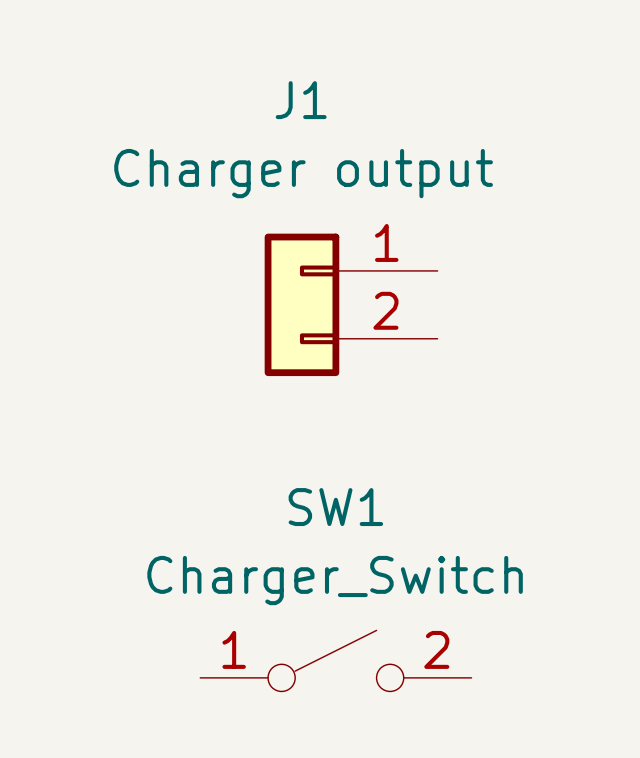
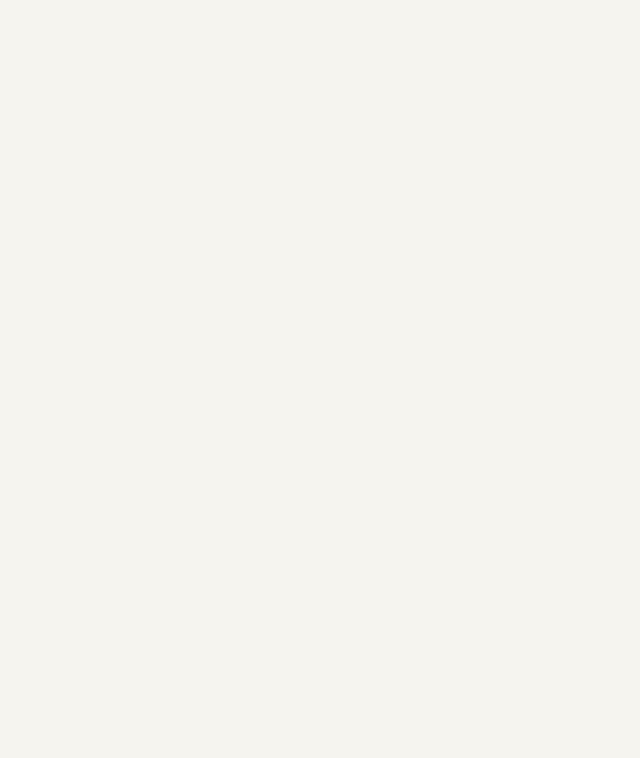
J1: Charger output (351, 304) -> none
SW1: Charger_Switch (335, 660) -> none

